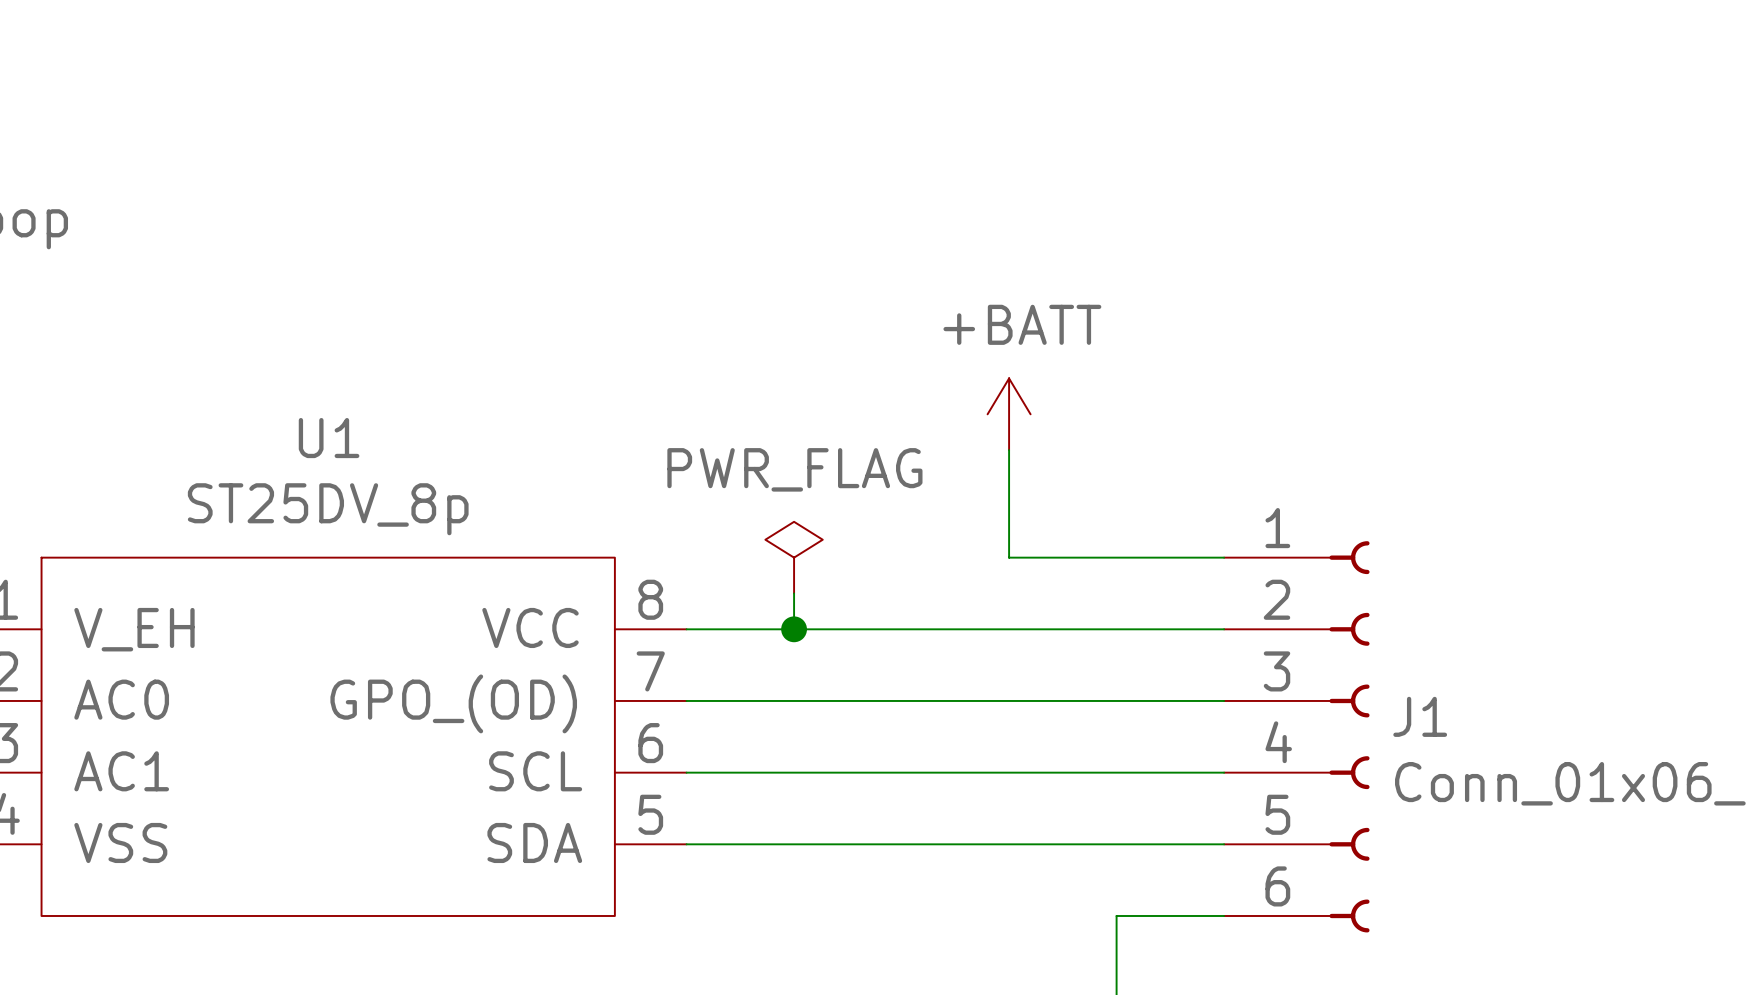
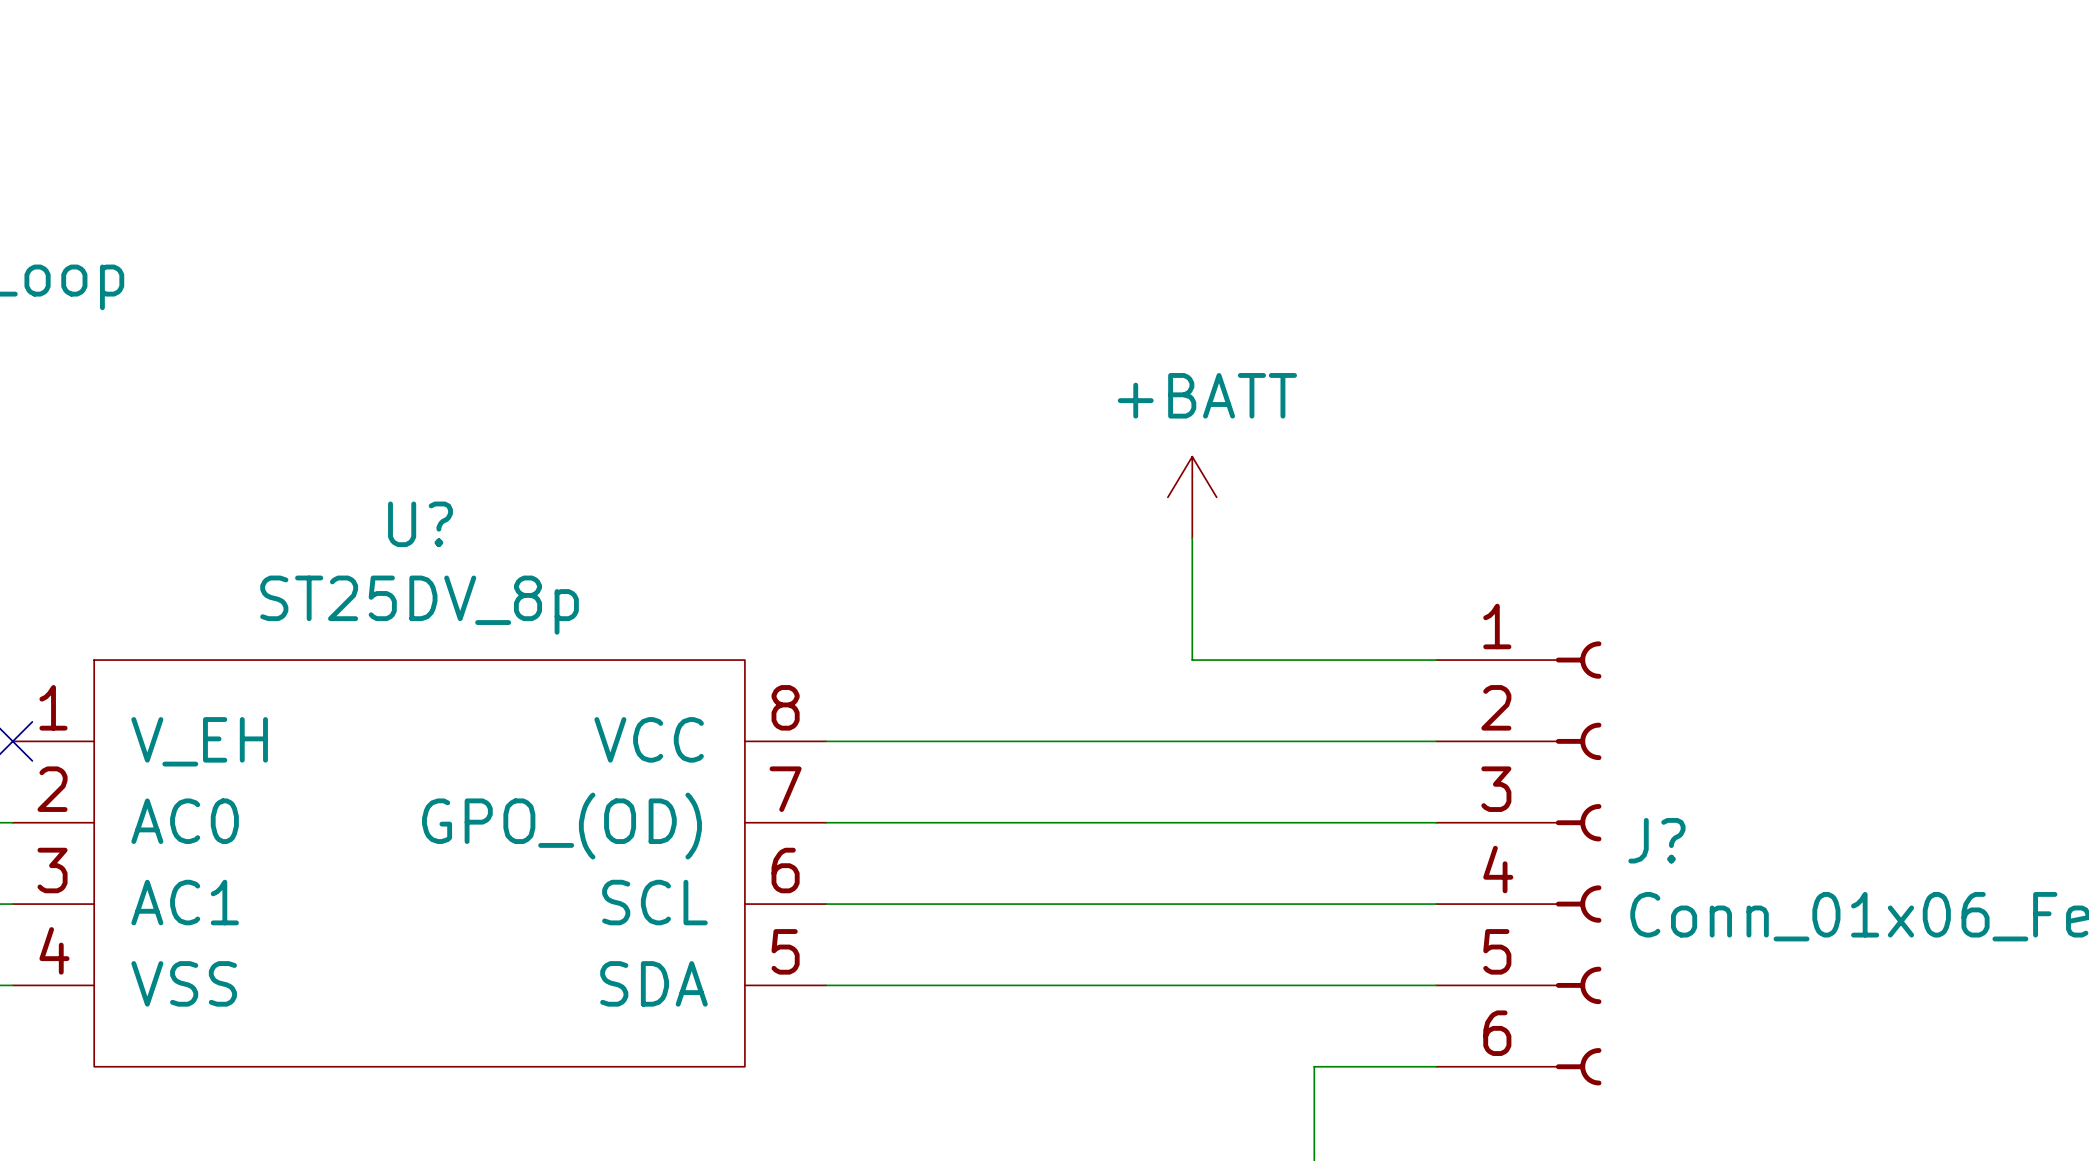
U1 name: U1 (329, 438) -> U? (420, 524)
power symbol: PWR_FLAG (794, 557) -> none
wire: (794, 593) (794, 629) -> none
junction: (794, 629) -> none
J1 name: J1 (1420, 716) -> J? (1656, 840)

